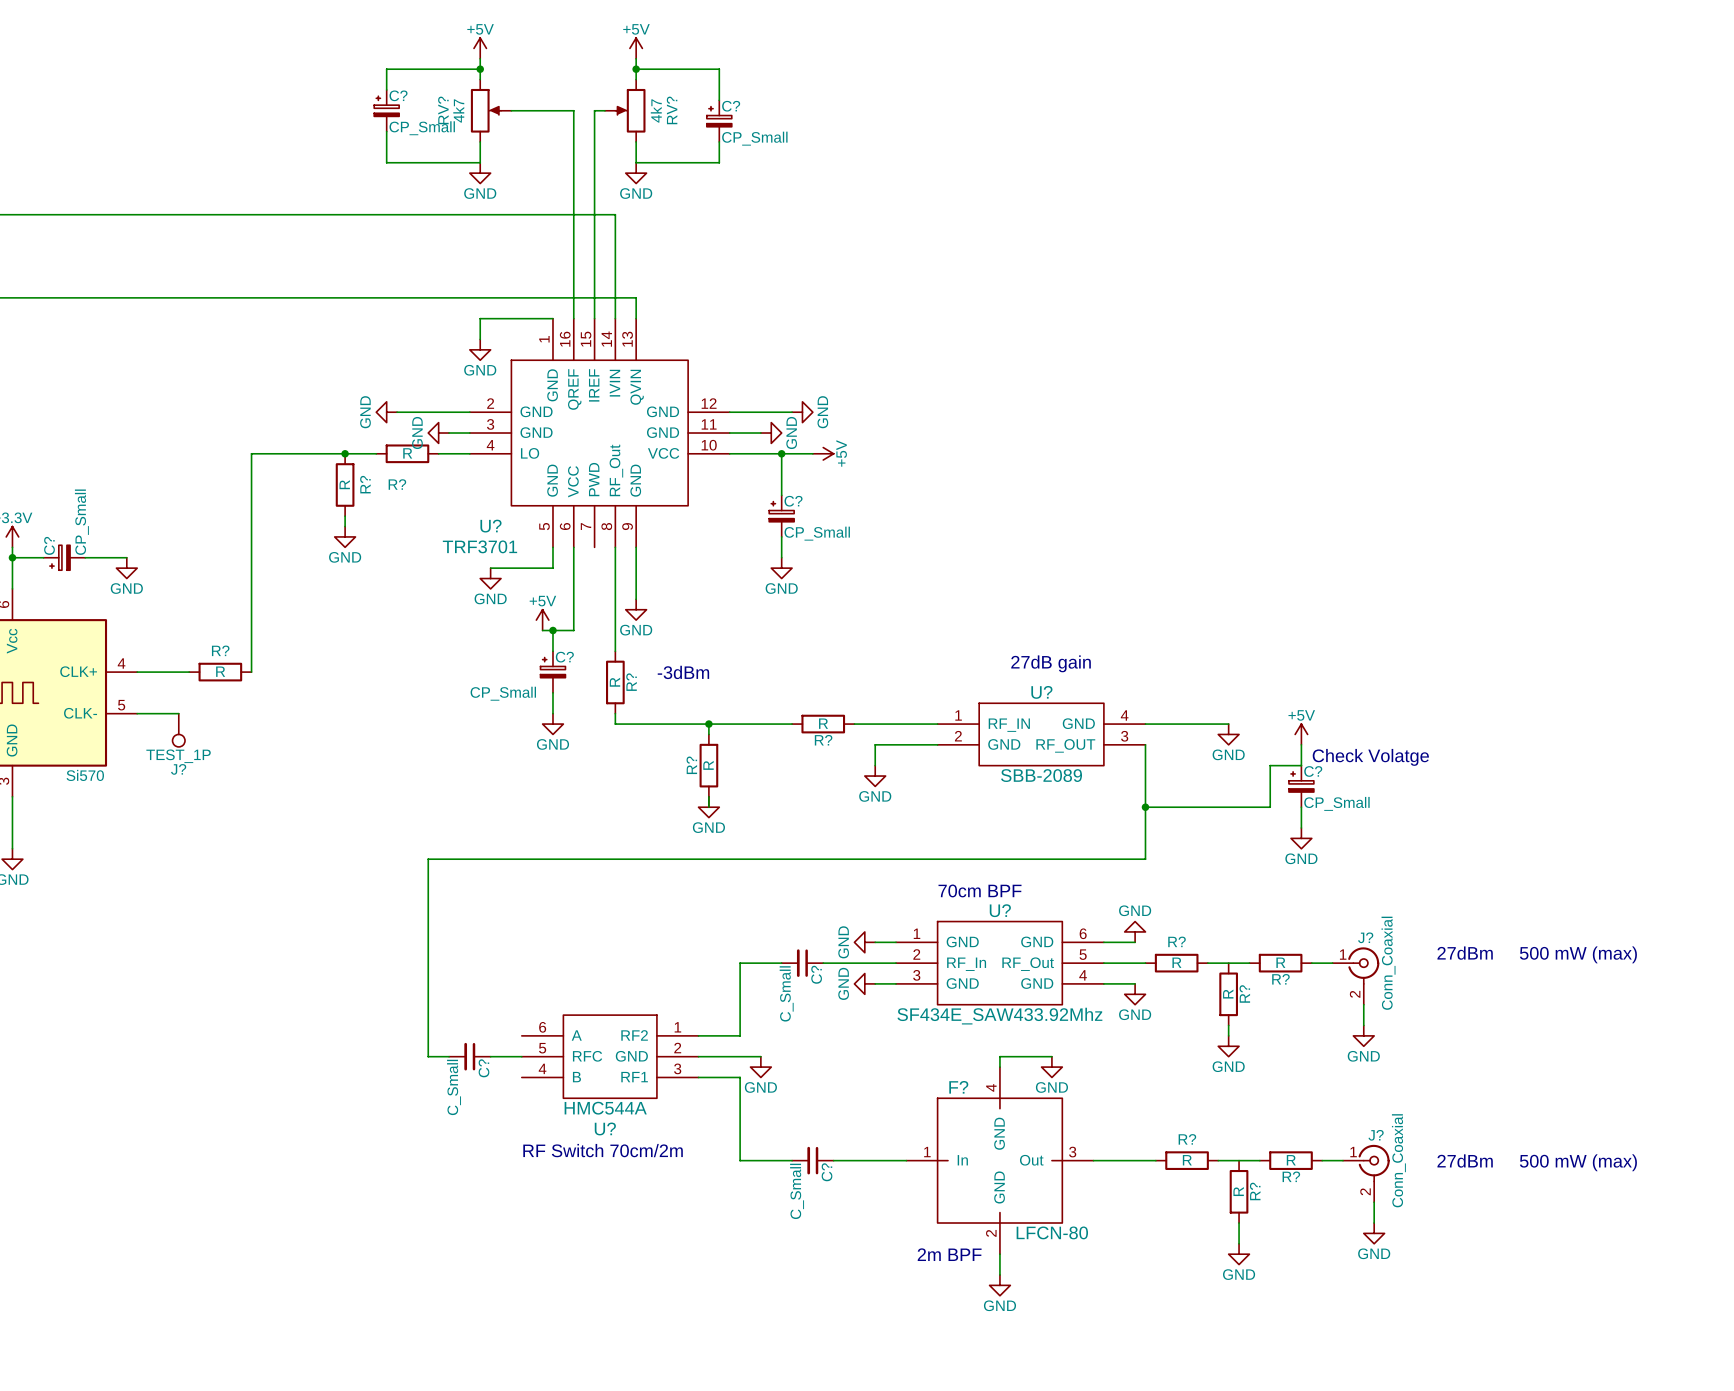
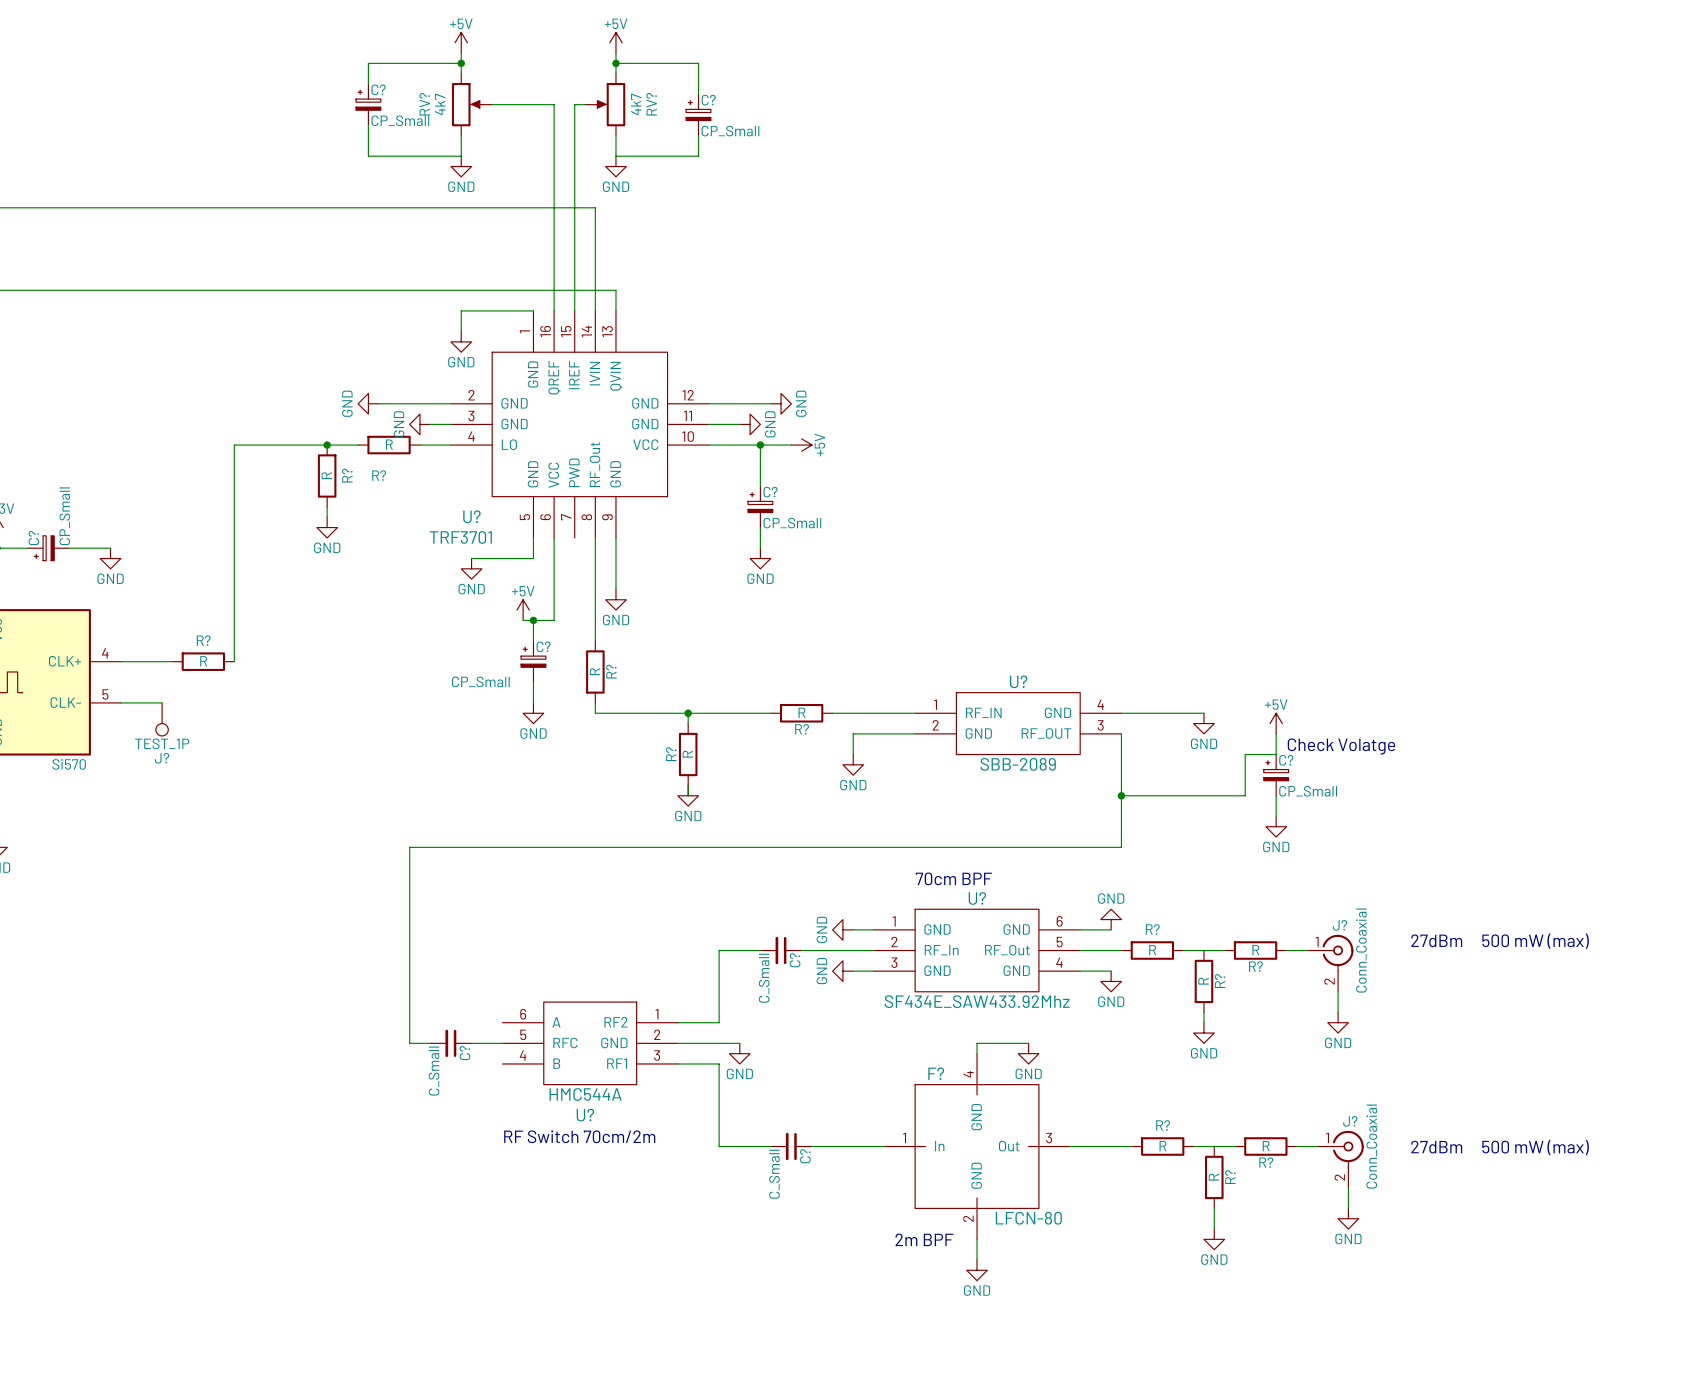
text: 27dB gain (1051, 663) -> none
text: -3dBm (683, 672) -> none

